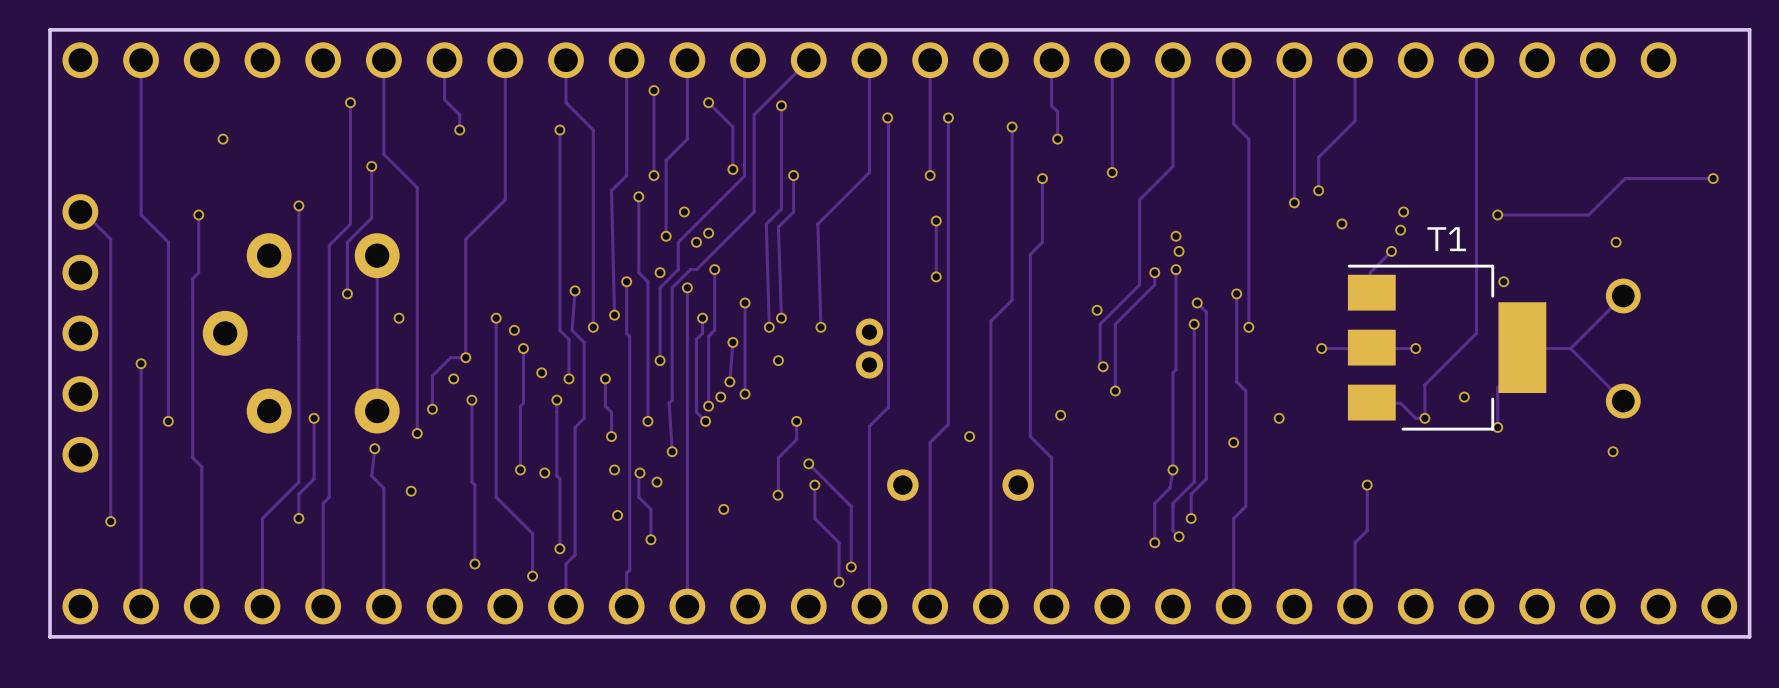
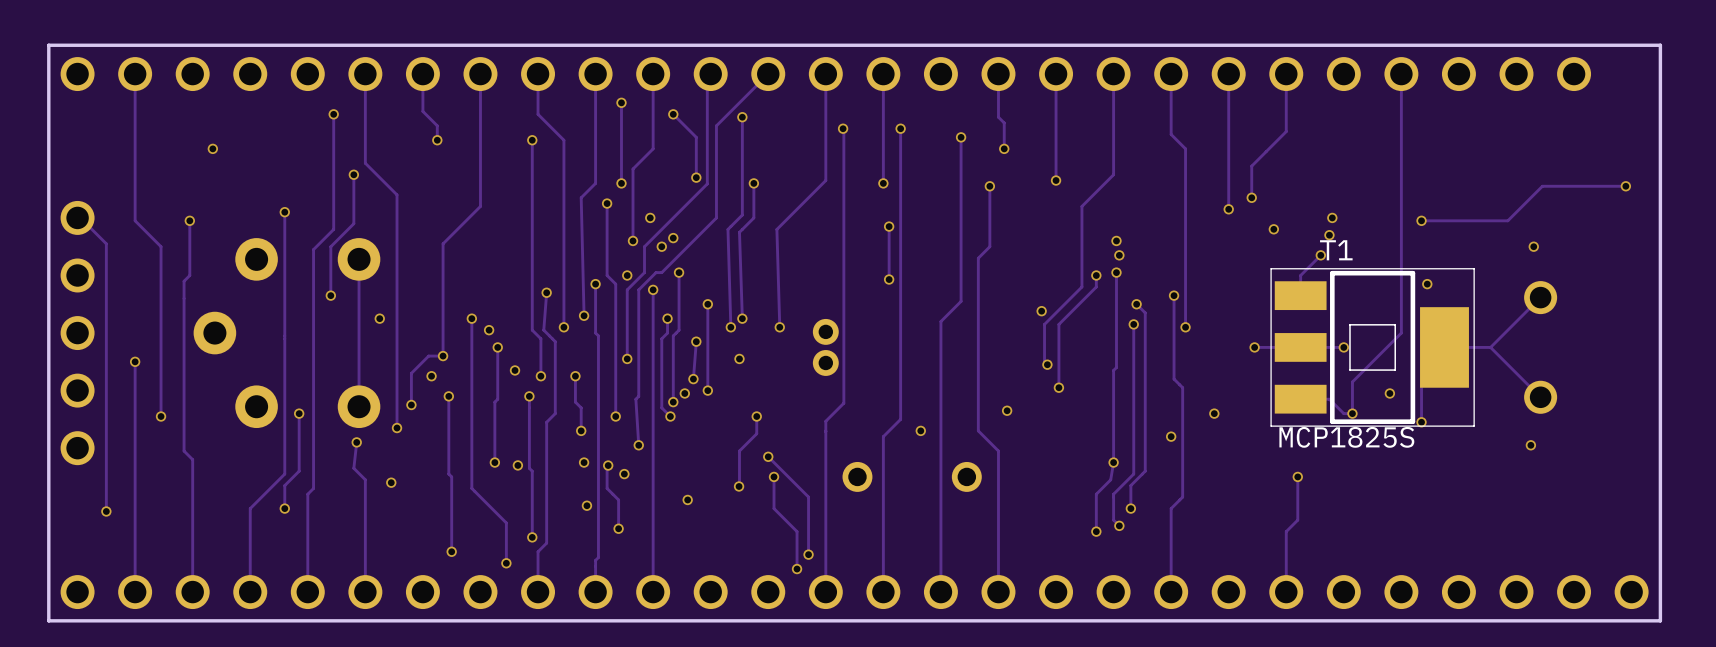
T1 footprint: [1347, 264, 1547, 431] -> [1270, 268, 1475, 427]
T1 value: none -> MCP1825S (1346, 437)

